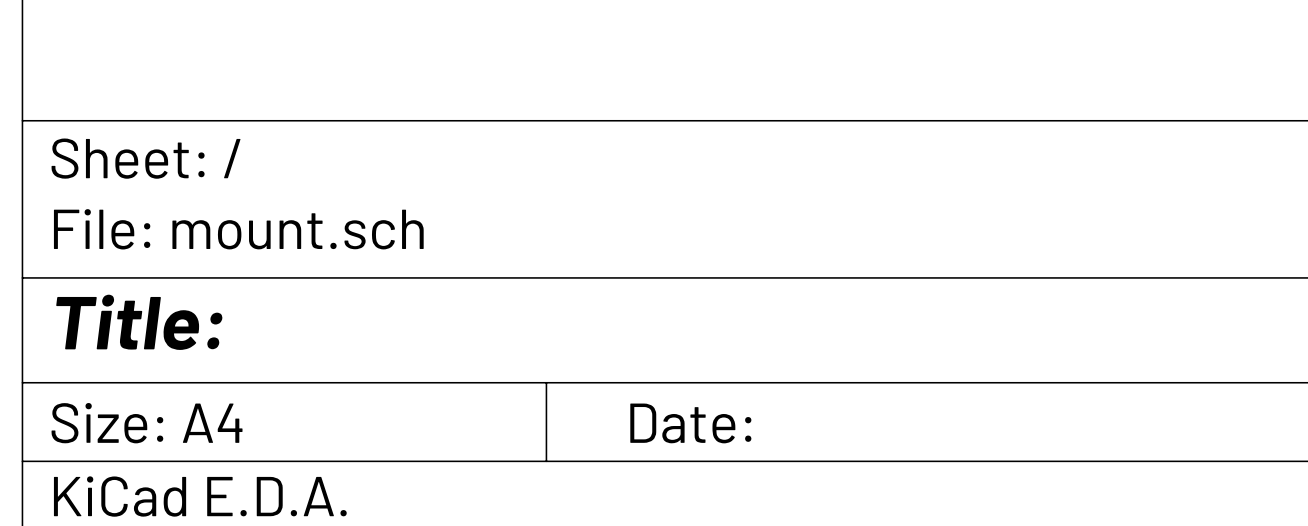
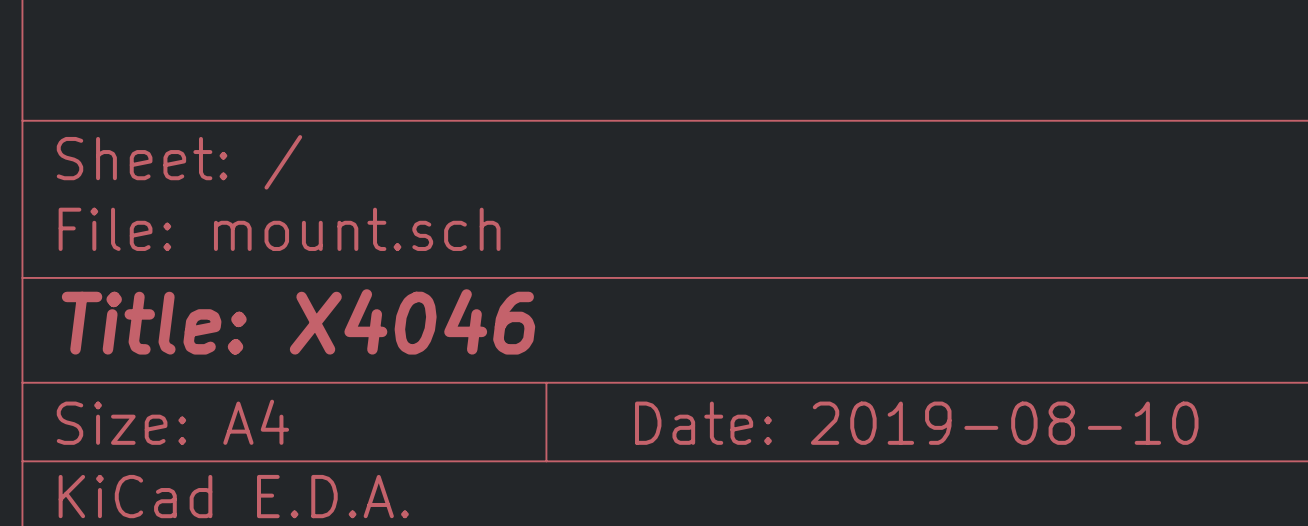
title block: Title: (139, 322) -> Title: X4046 (298, 321)
title block: Date: (690, 423) -> Date: 2019-08-10 (916, 423)

